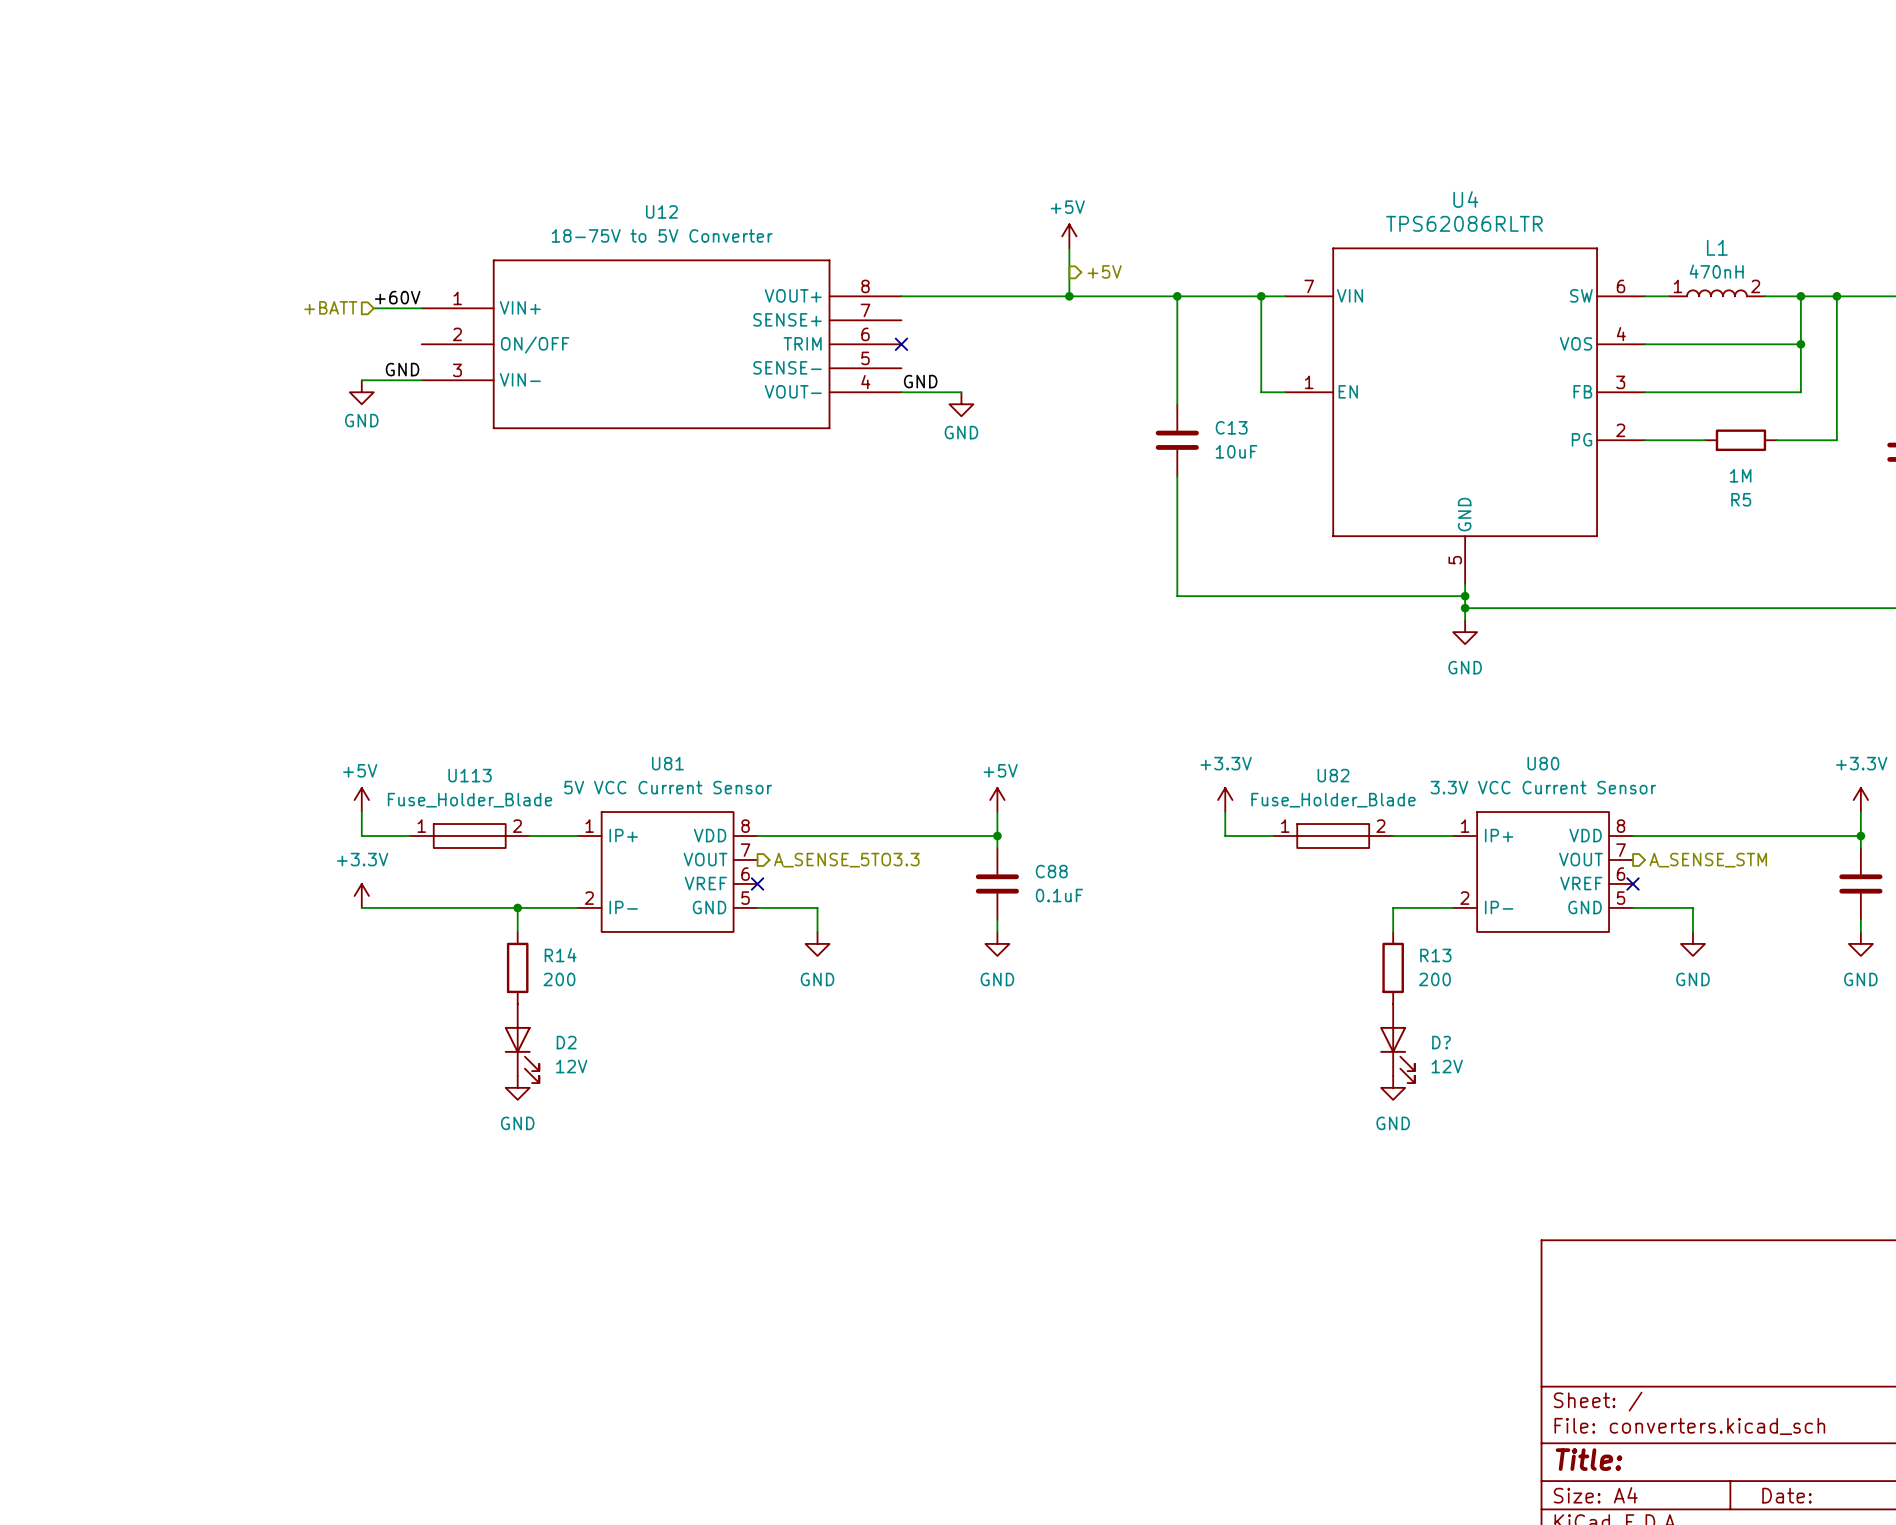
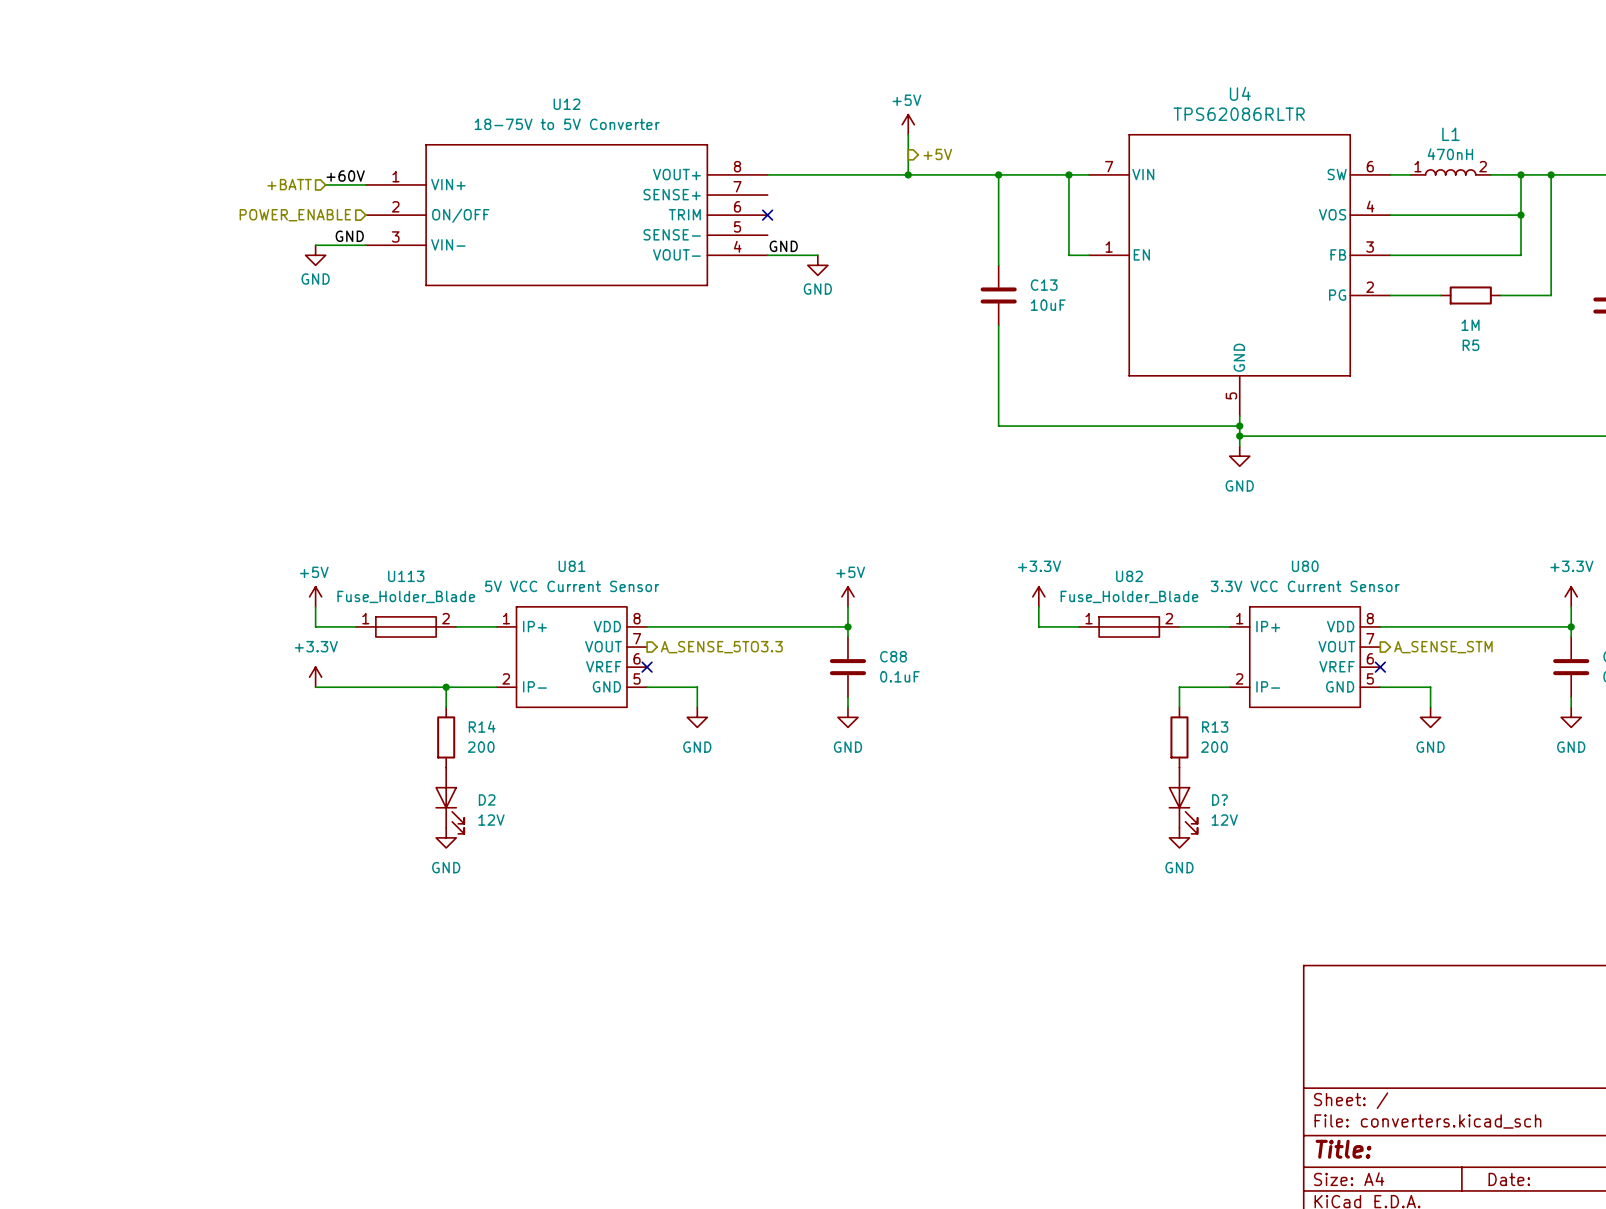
hierarchical label: none -> POWER_ENABLE (295, 215)

